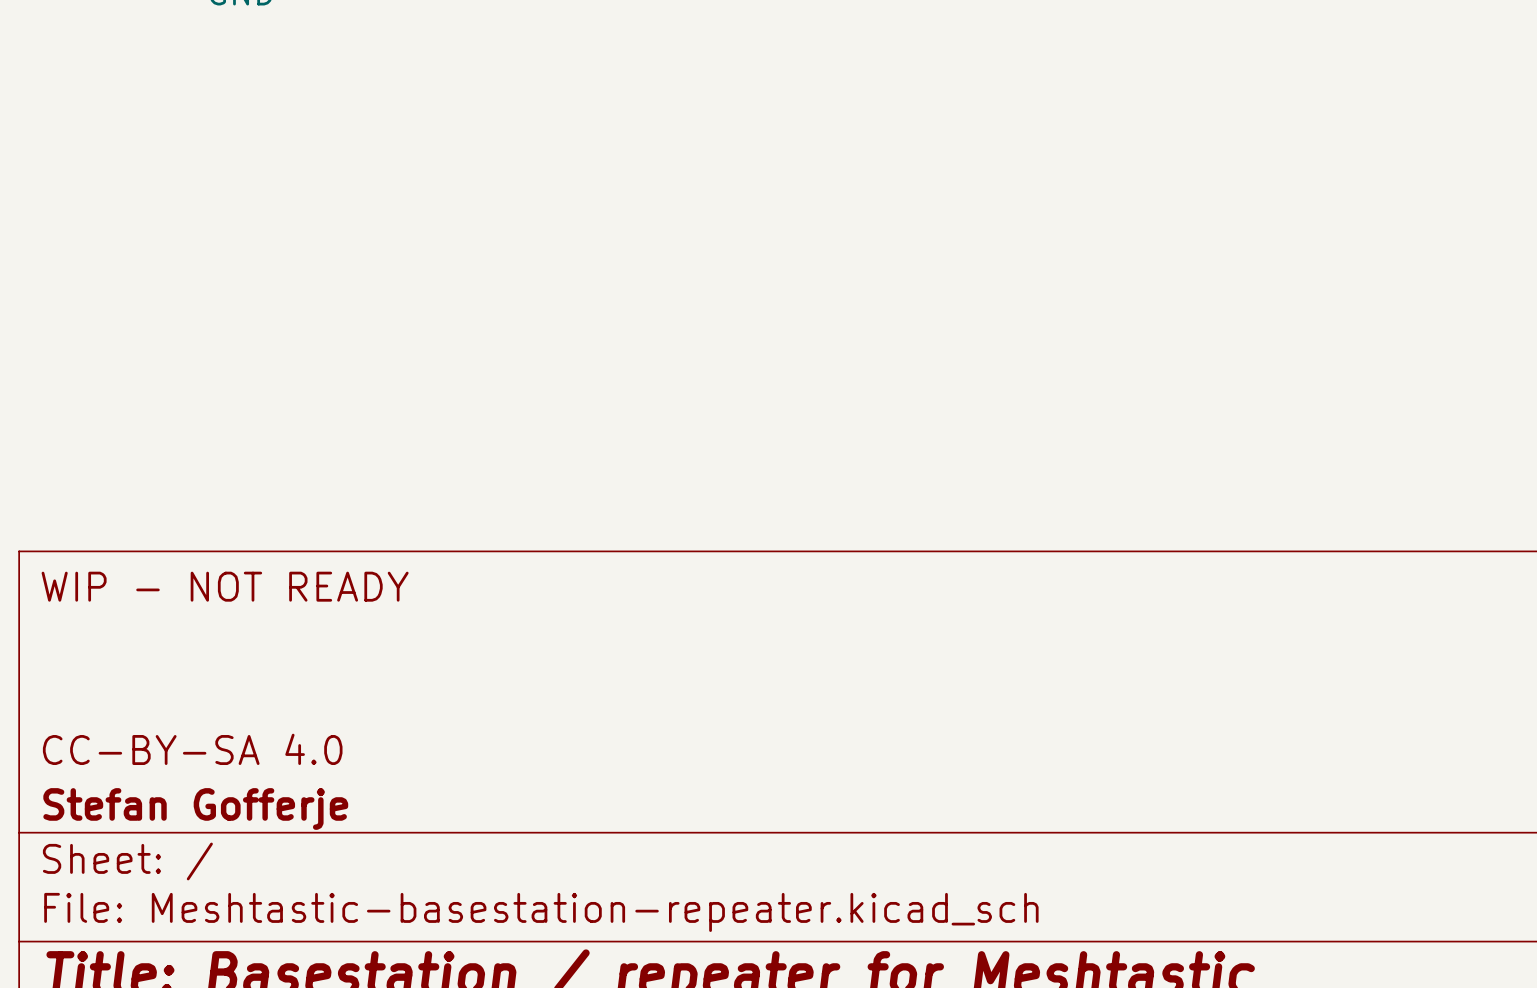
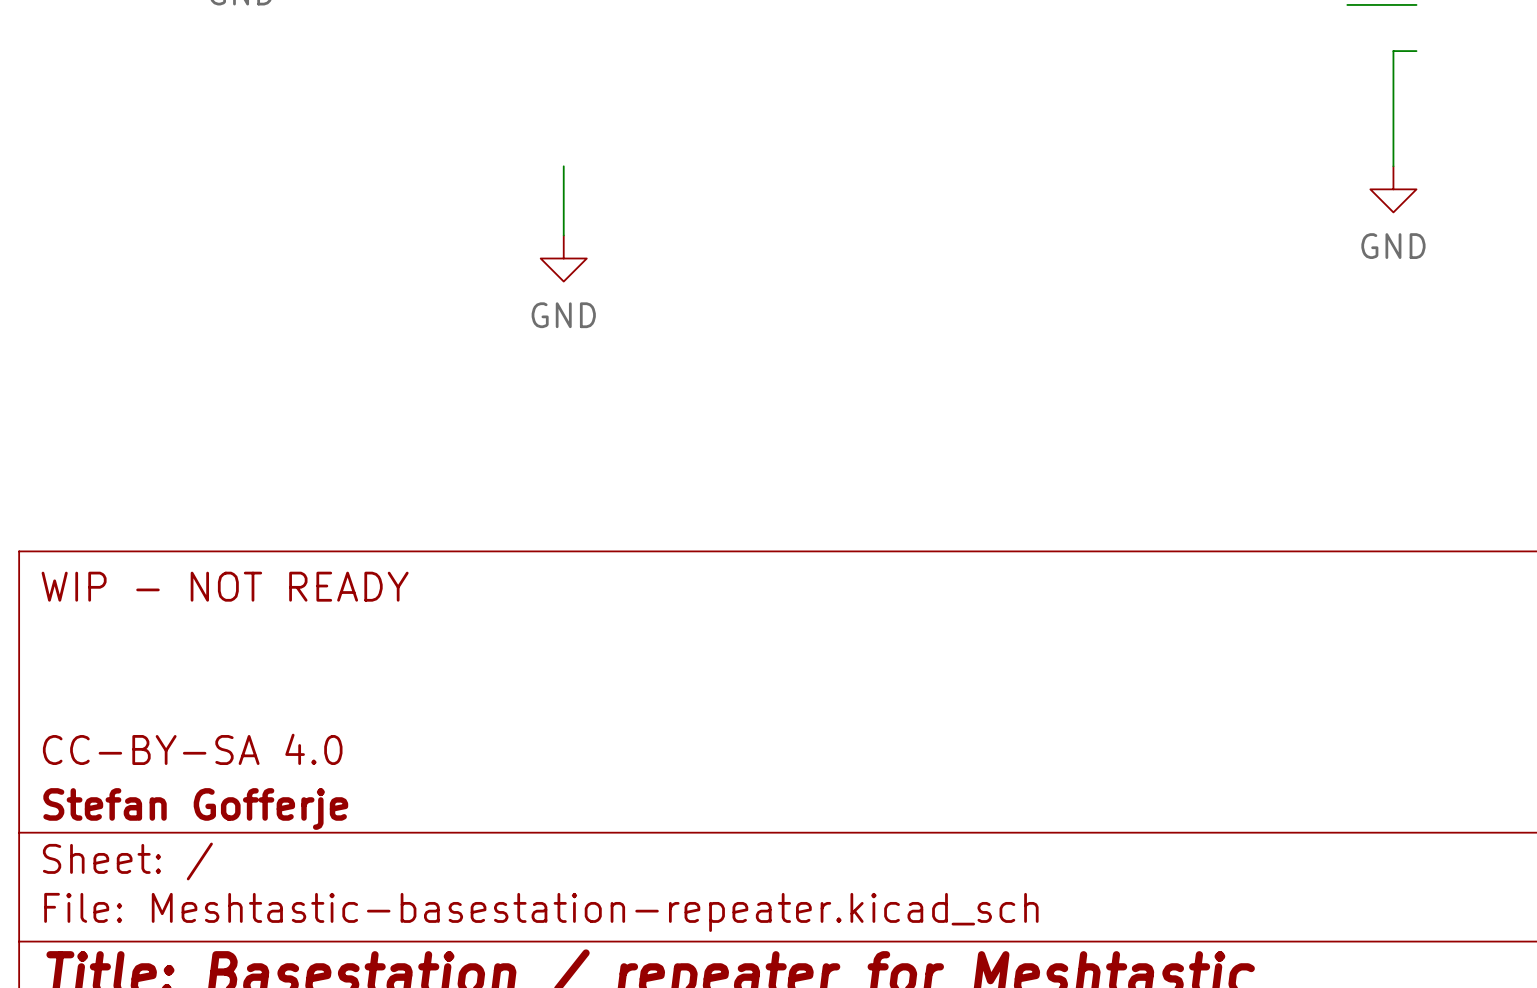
wire: none -> (1347, 4) (1416, 4)
wire: none -> (1416, 51) (1393, 51) (1393, 166)
wire: none -> (563, 166) (563, 235)
power symbol: none -> GND (1393, 189)
power symbol: none -> GND (563, 258)

